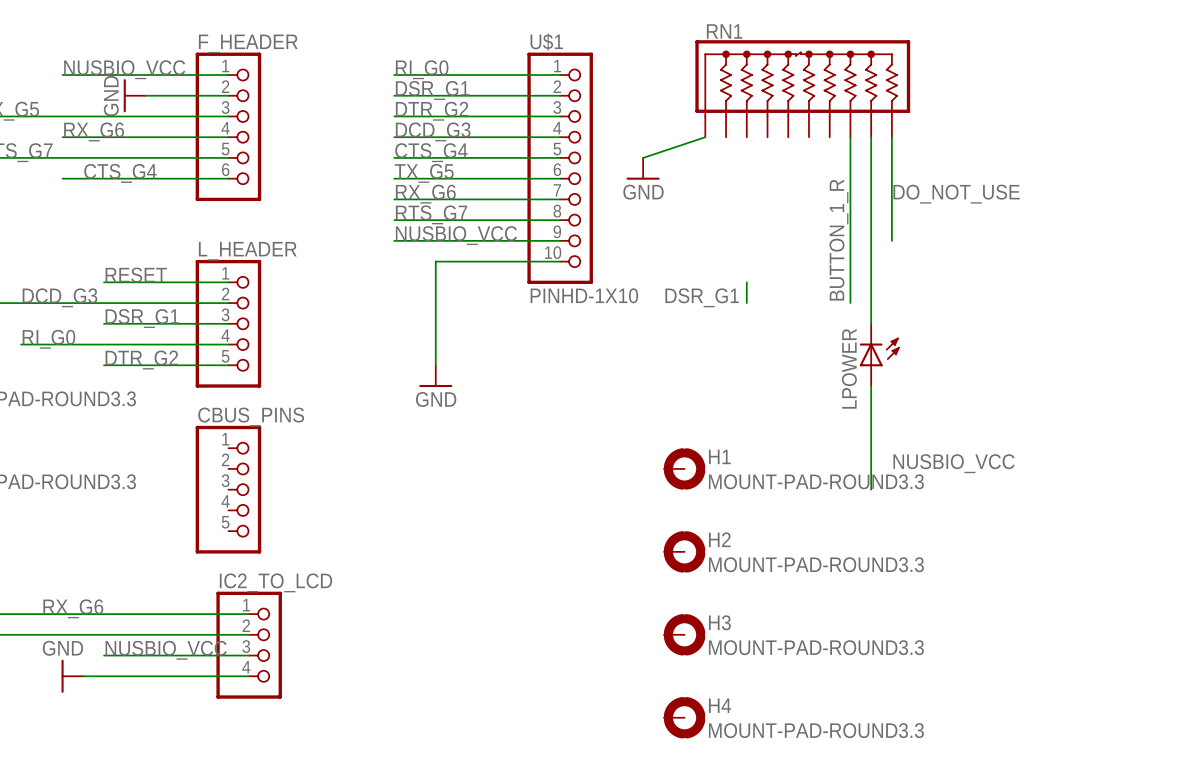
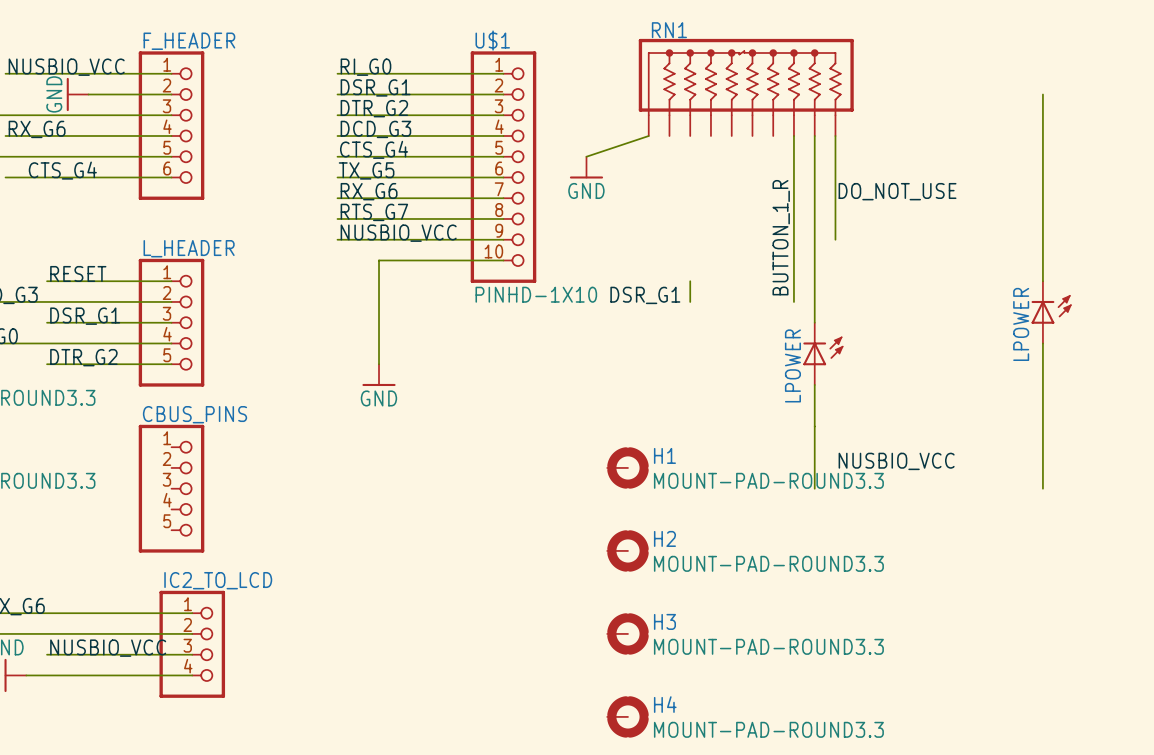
wire: none -> (1042, 94) (1042, 281)
LPOWER: none -> (1051, 312)
wire: none -> (1042, 343) (1042, 488)

